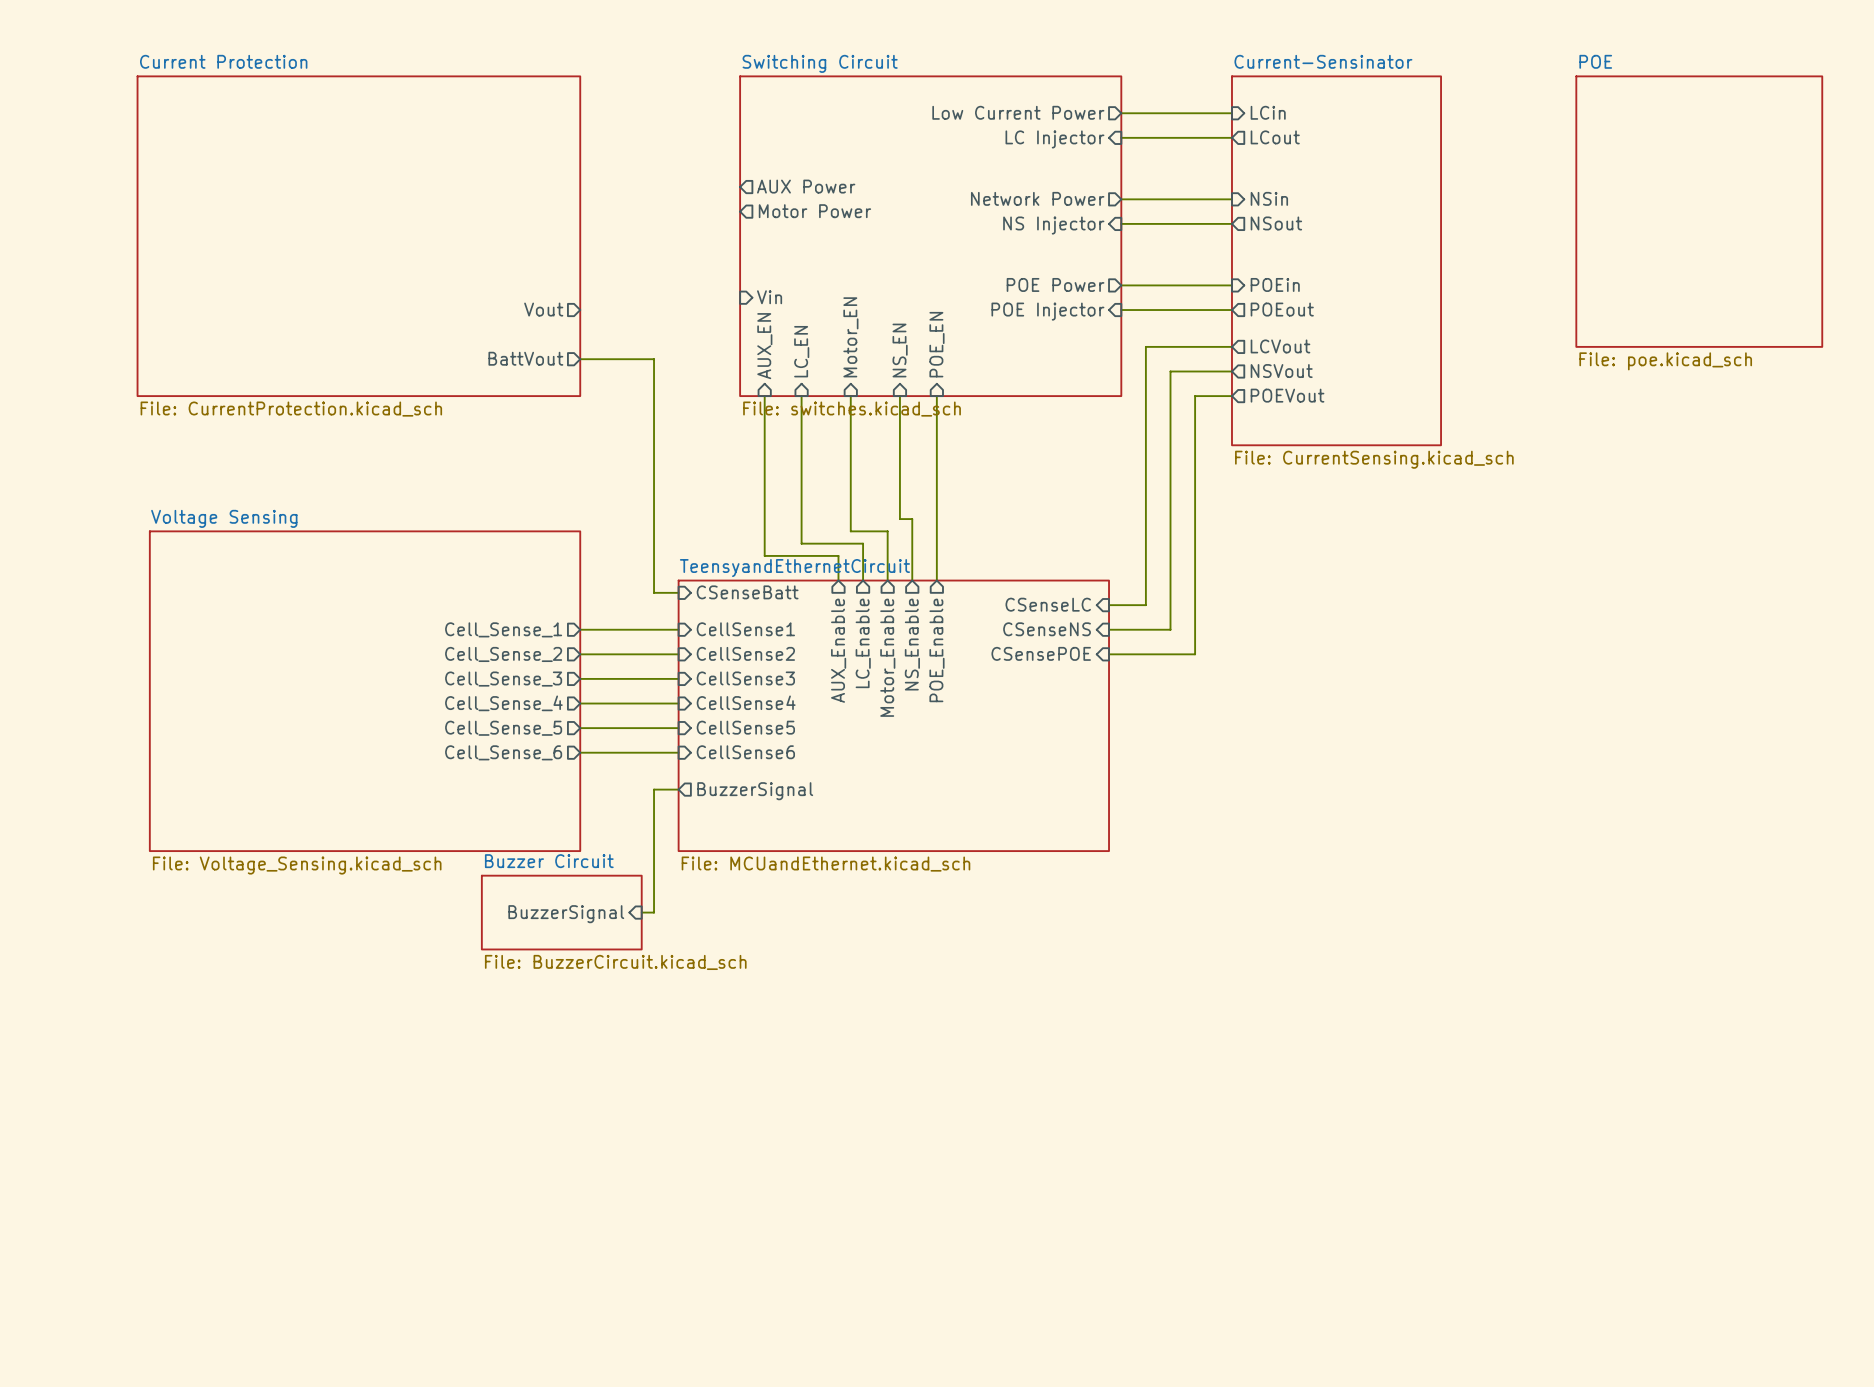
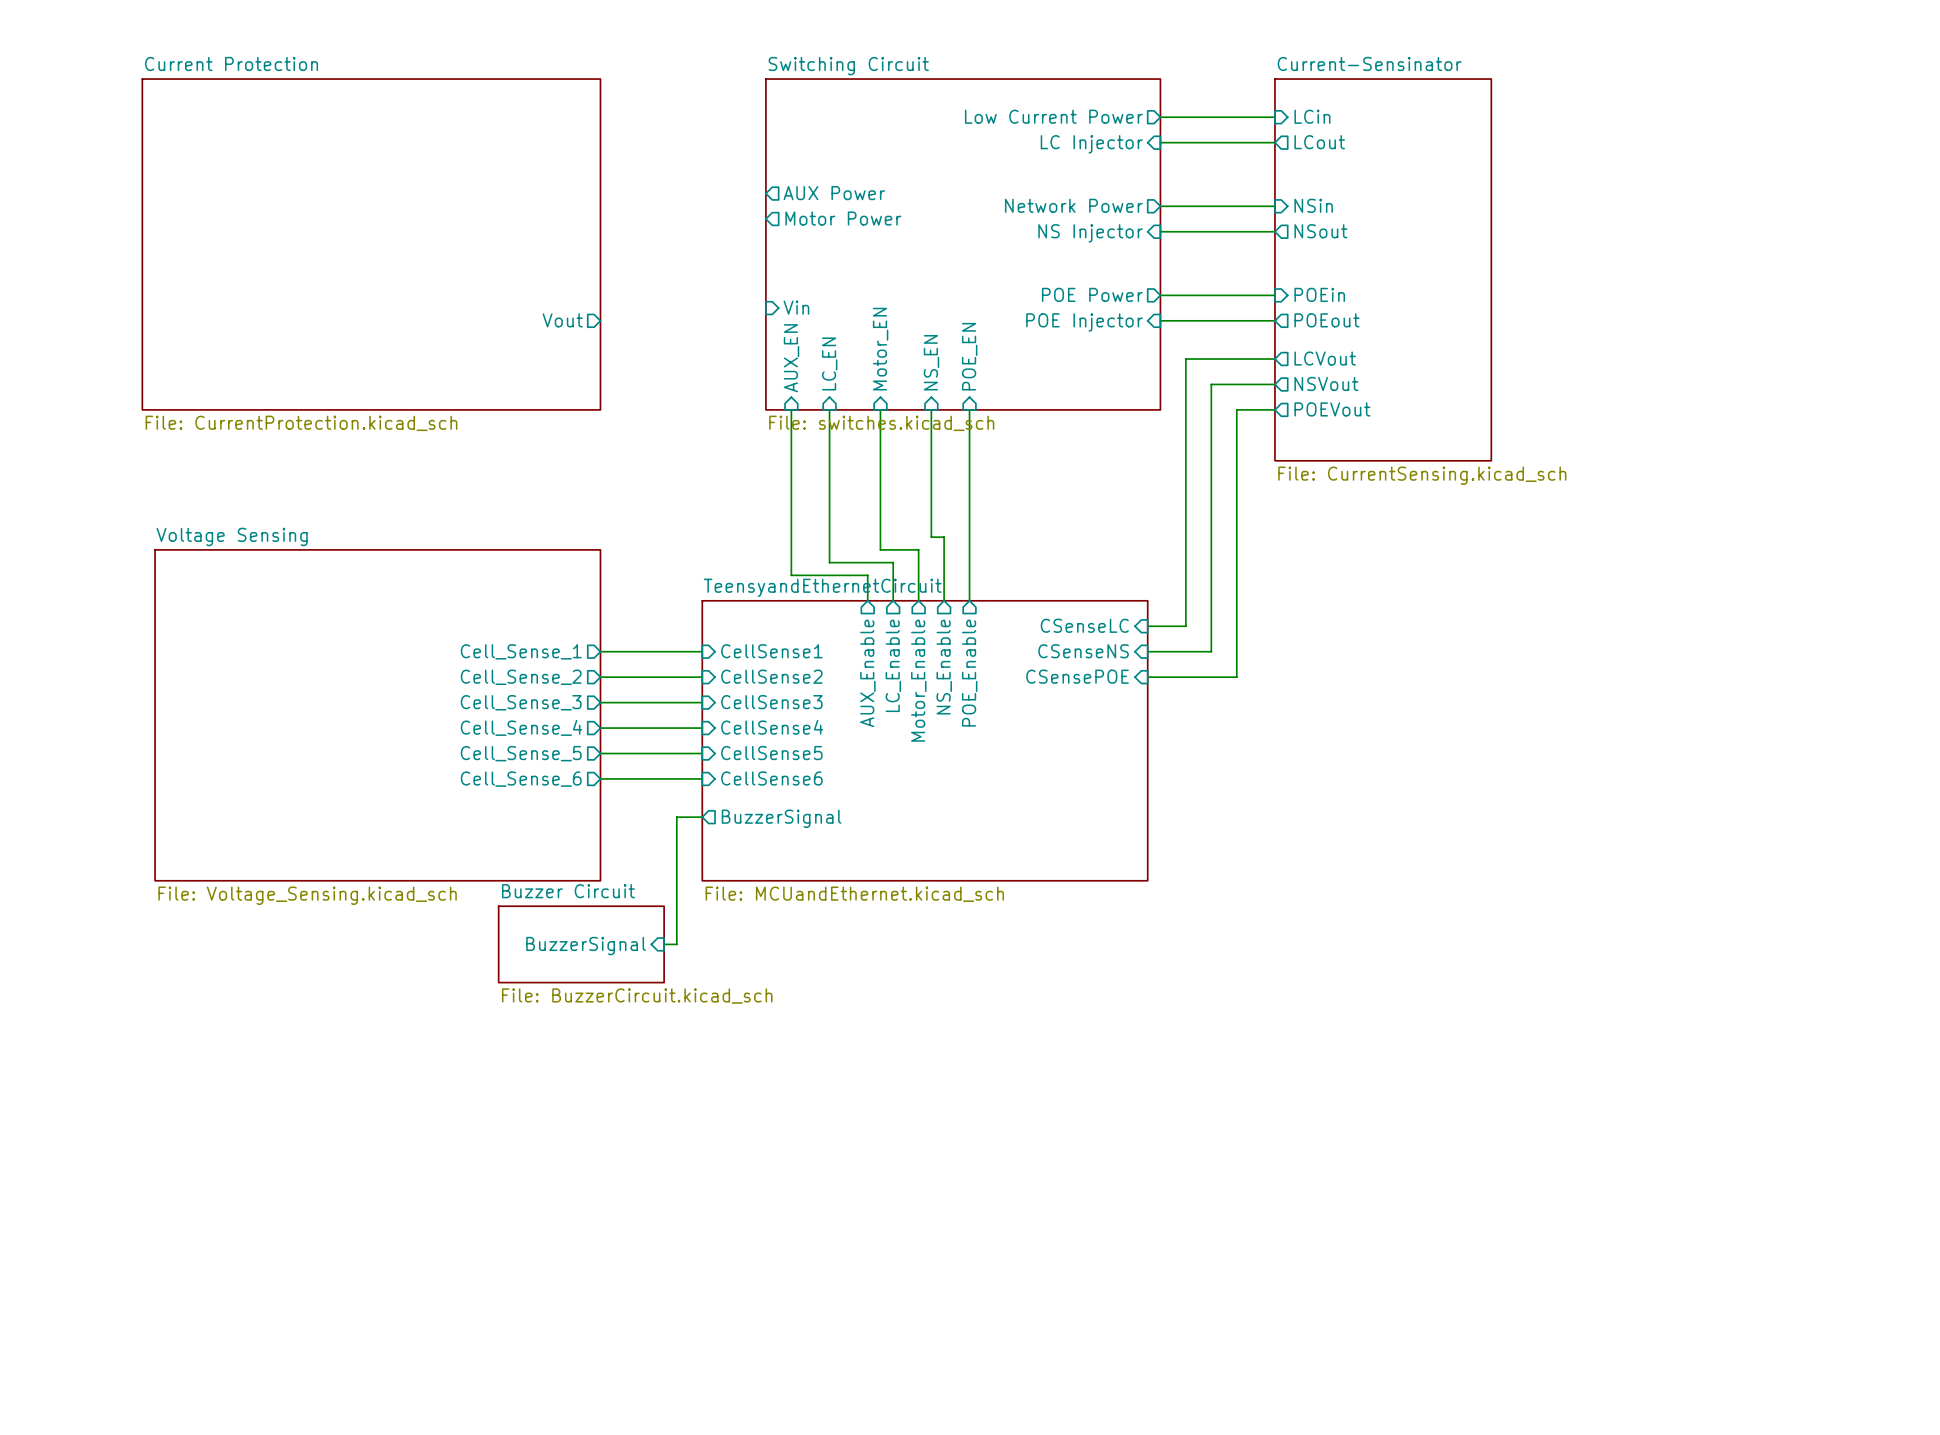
sheet POE: File: poe.kicad_sch (1699, 211) -> none
sheet pin: BattVout (525, 358) -> none
wire: (580, 359) (654, 359) (654, 592) (678, 592) -> none
sheet pin: CSenseBatt (747, 592) -> none

